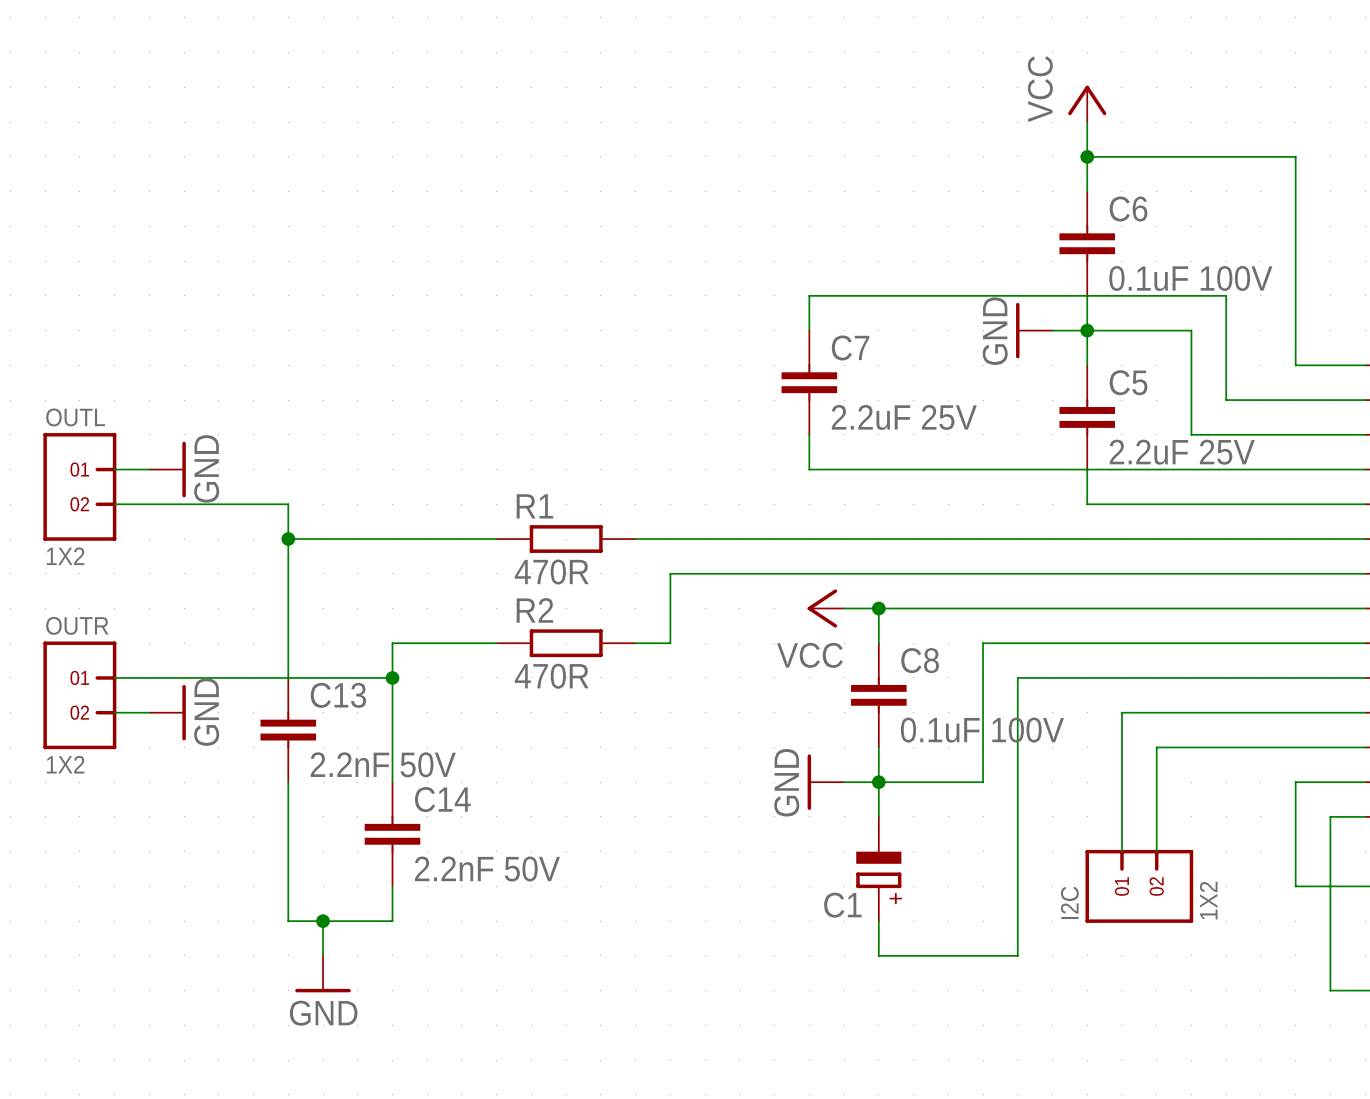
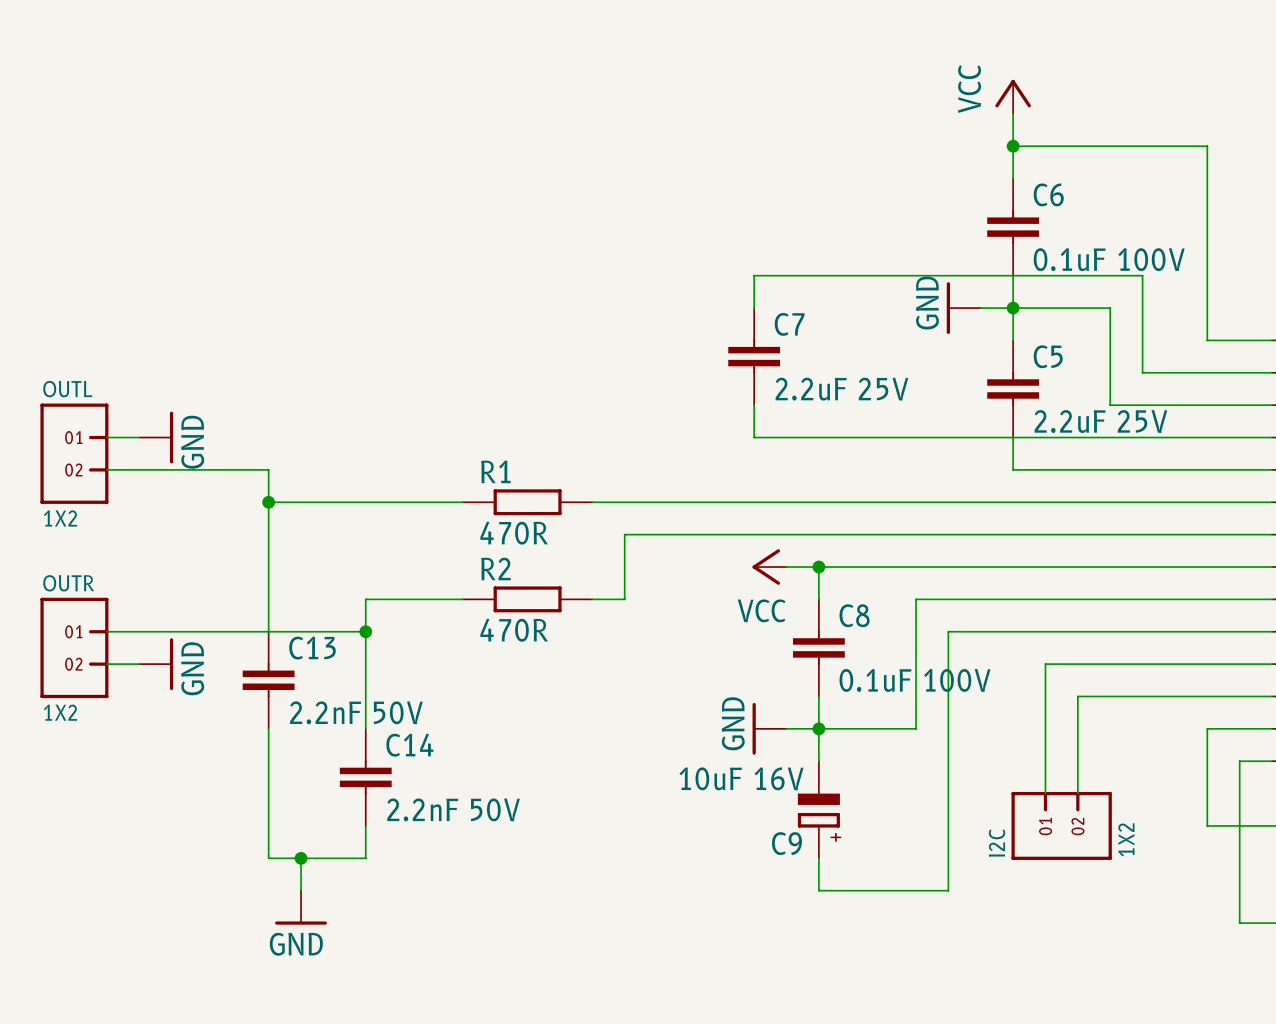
C1 value: none -> 10uF 16V (741, 778)
C1 name: C1 (842, 905) -> C9 (786, 843)

